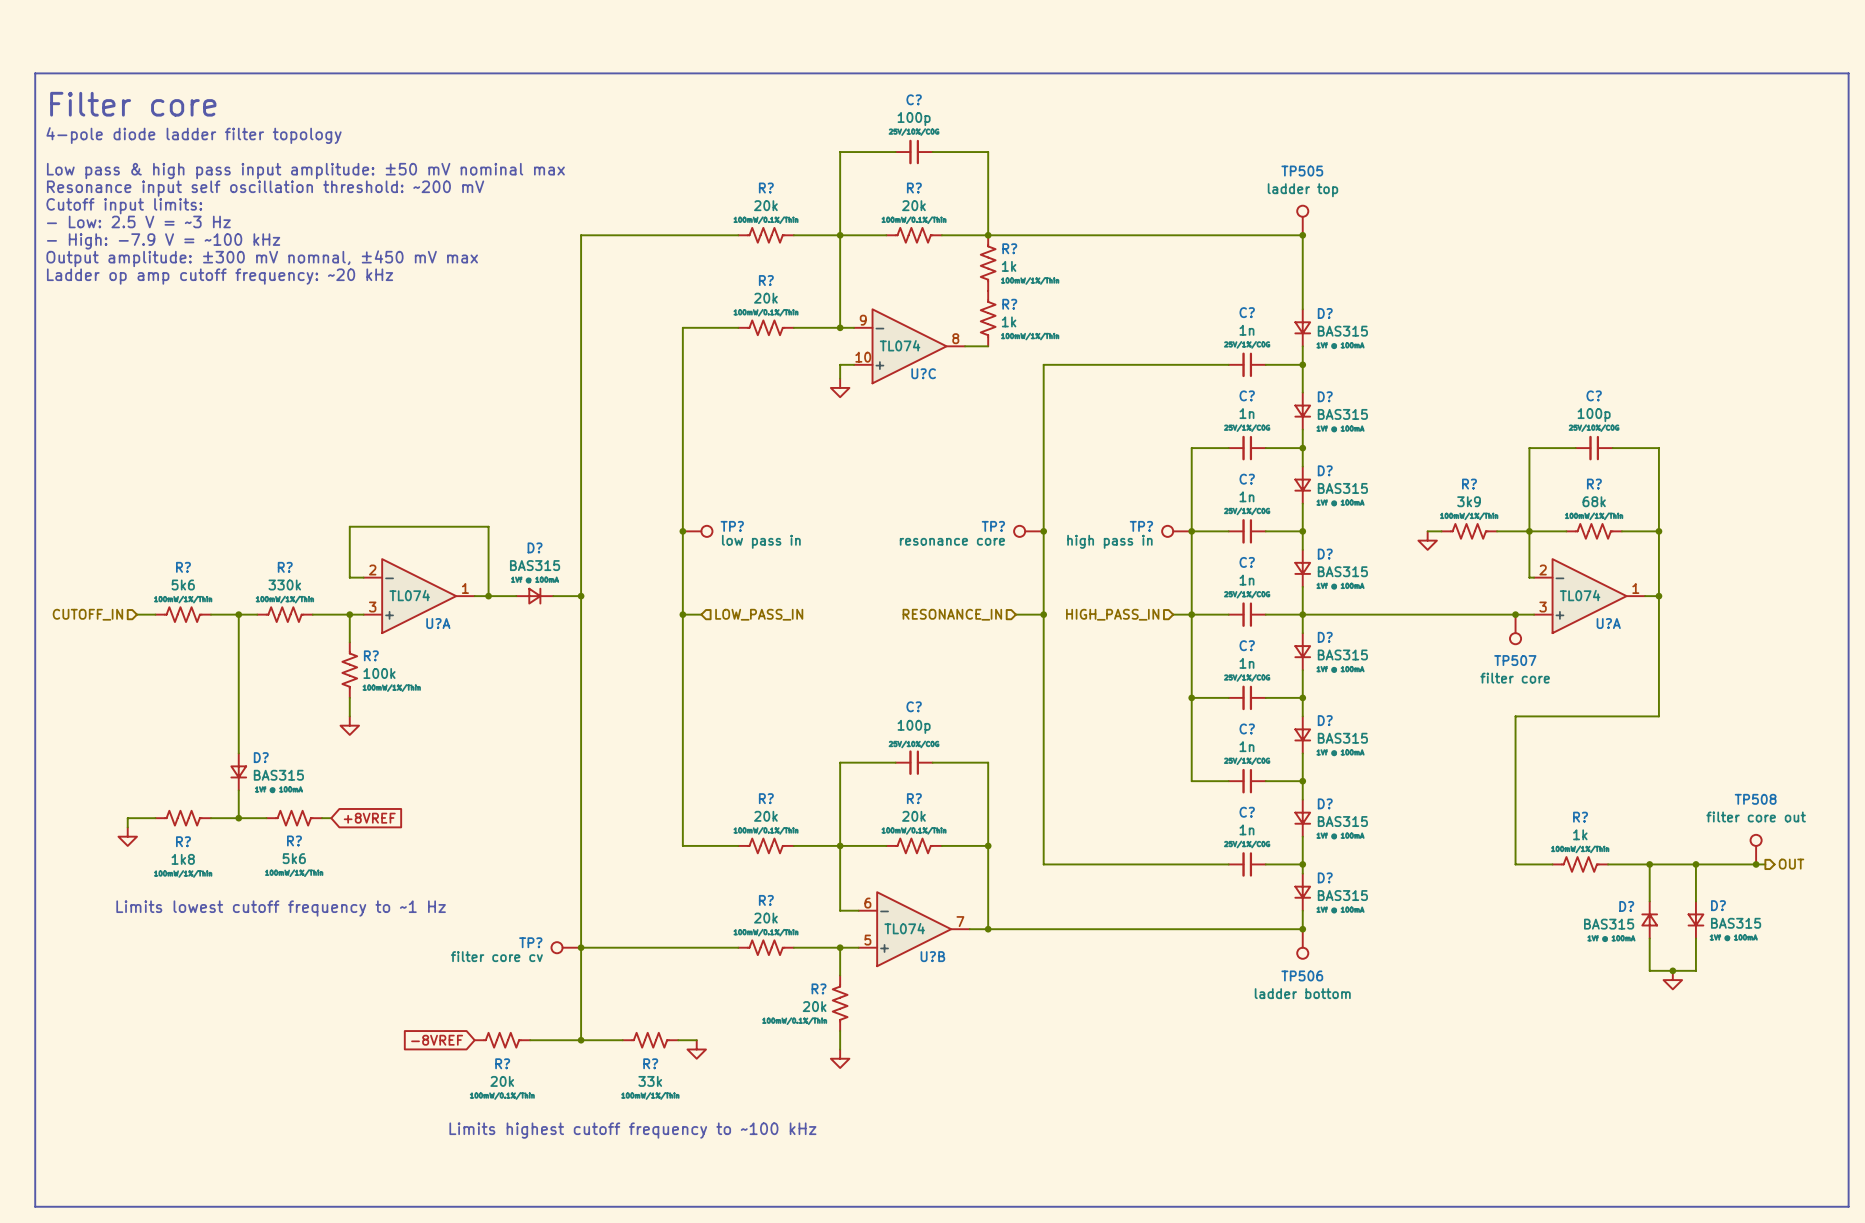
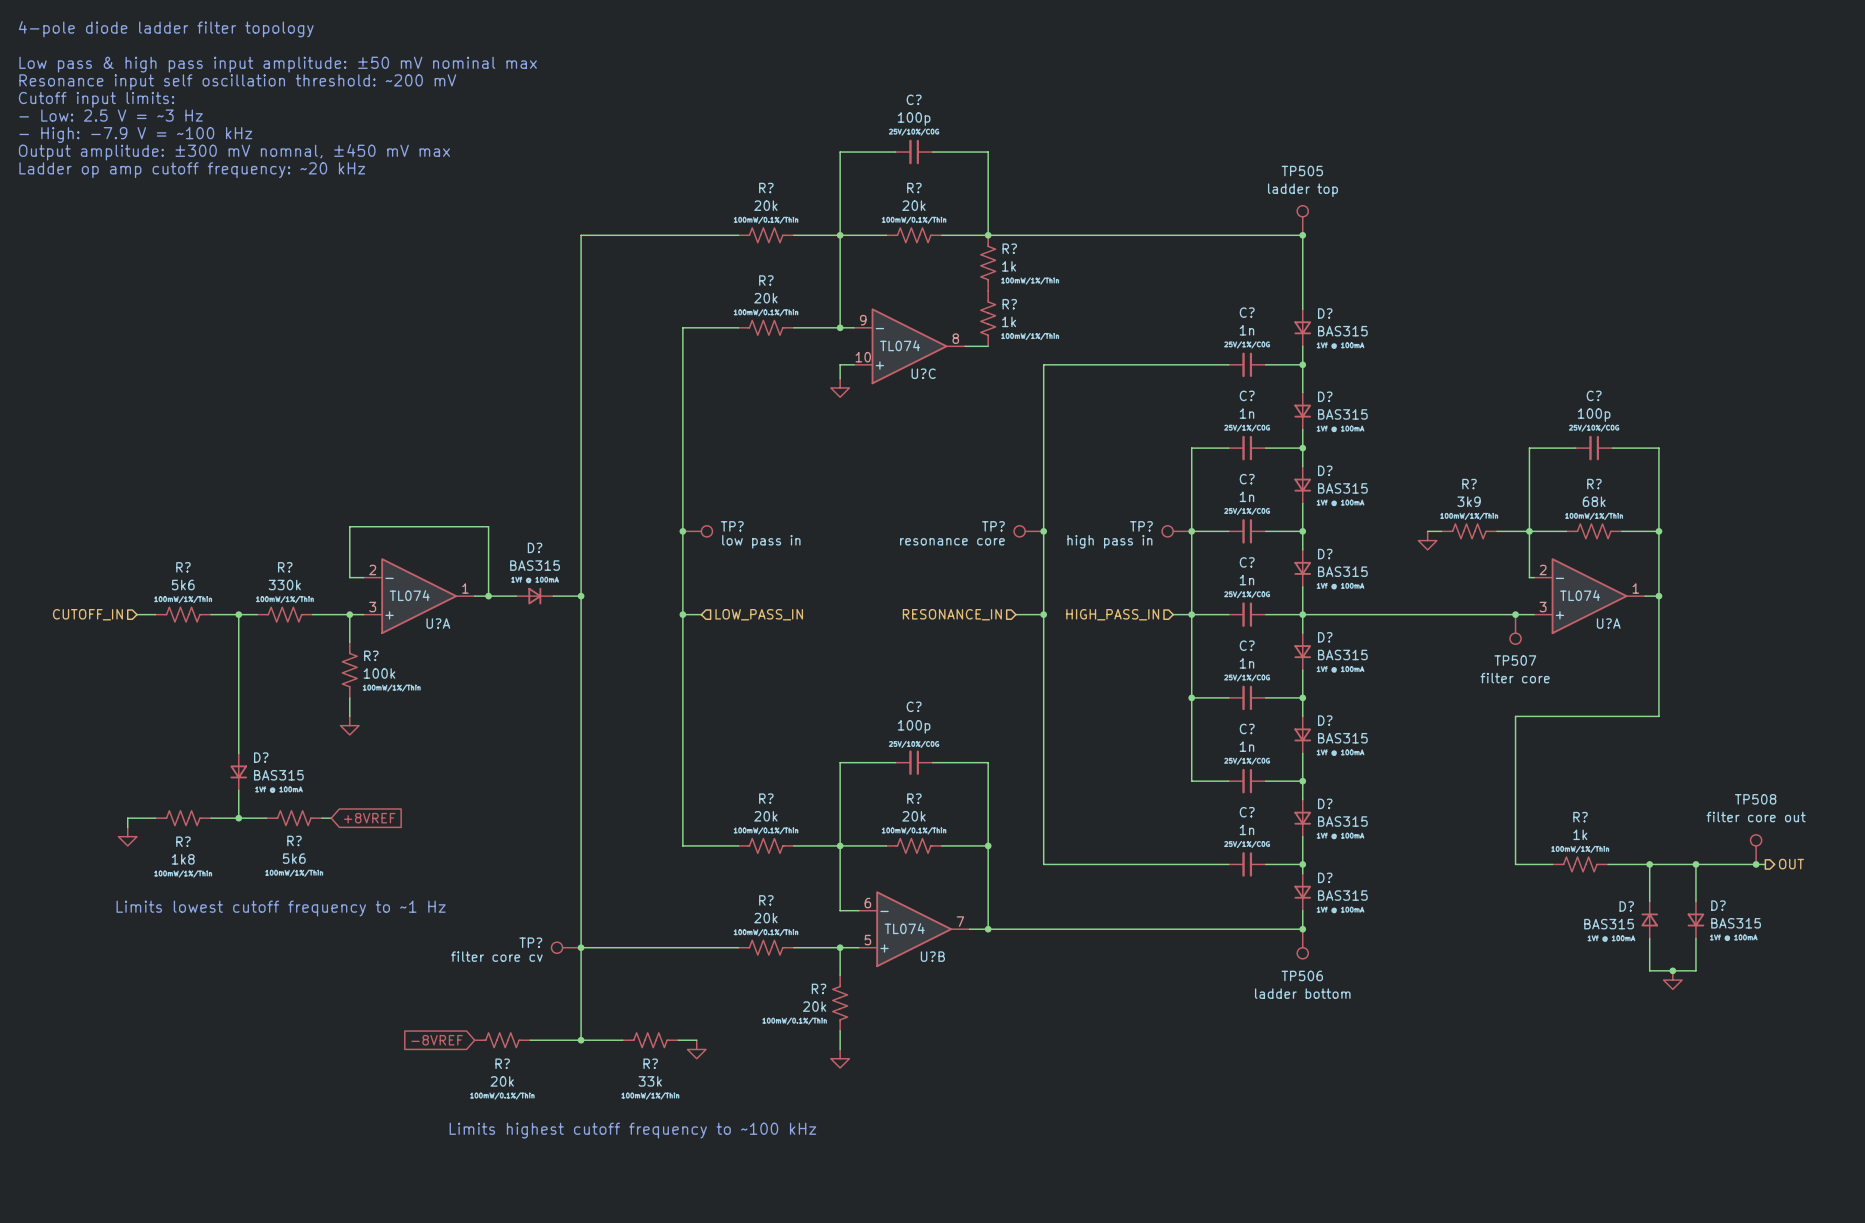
line: (35, 73) (1848, 73) (1848, 1206) (35, 1206) (35, 73) -> none
text: Filter core (133, 104) -> none
text position: 4-pole diode ladder filter topology (194, 135) -> 4-pole diode ladder filter topology (166, 29)
text position: Low pass & high pass input amplitude: ±50 mV nominal max (305, 171) -> Low pass & high pass input amplitude: ±50 mV nominal max (278, 64)
text position: Resonance input self oscillation threshold: ~200 mV (265, 188) -> Resonance input self oscillation threshold: ~200 mV (237, 82)
text position: Cutoff input limits: (124, 206) -> Cutoff input limits: (96, 99)
text position: - Low: 2.5 V = ~3 Hz (138, 221) -> - Low: 2.5 V = ~3 Hz (111, 115)
text position: - High: -7.9 V = ~100 kHz (163, 241) -> - High: -7.9 V = ~100 kHz (135, 134)
text position: Output amplitude: ±300 mV nomnal, ±450 mV max (262, 258) -> Output amplitude: ±300 mV nomnal, ±450 mV max (234, 152)
text position: Ladder op amp cutoff frequency: ~20 kHz (220, 276) -> Ladder op amp cutoff frequency: ~20 kHz (192, 170)

